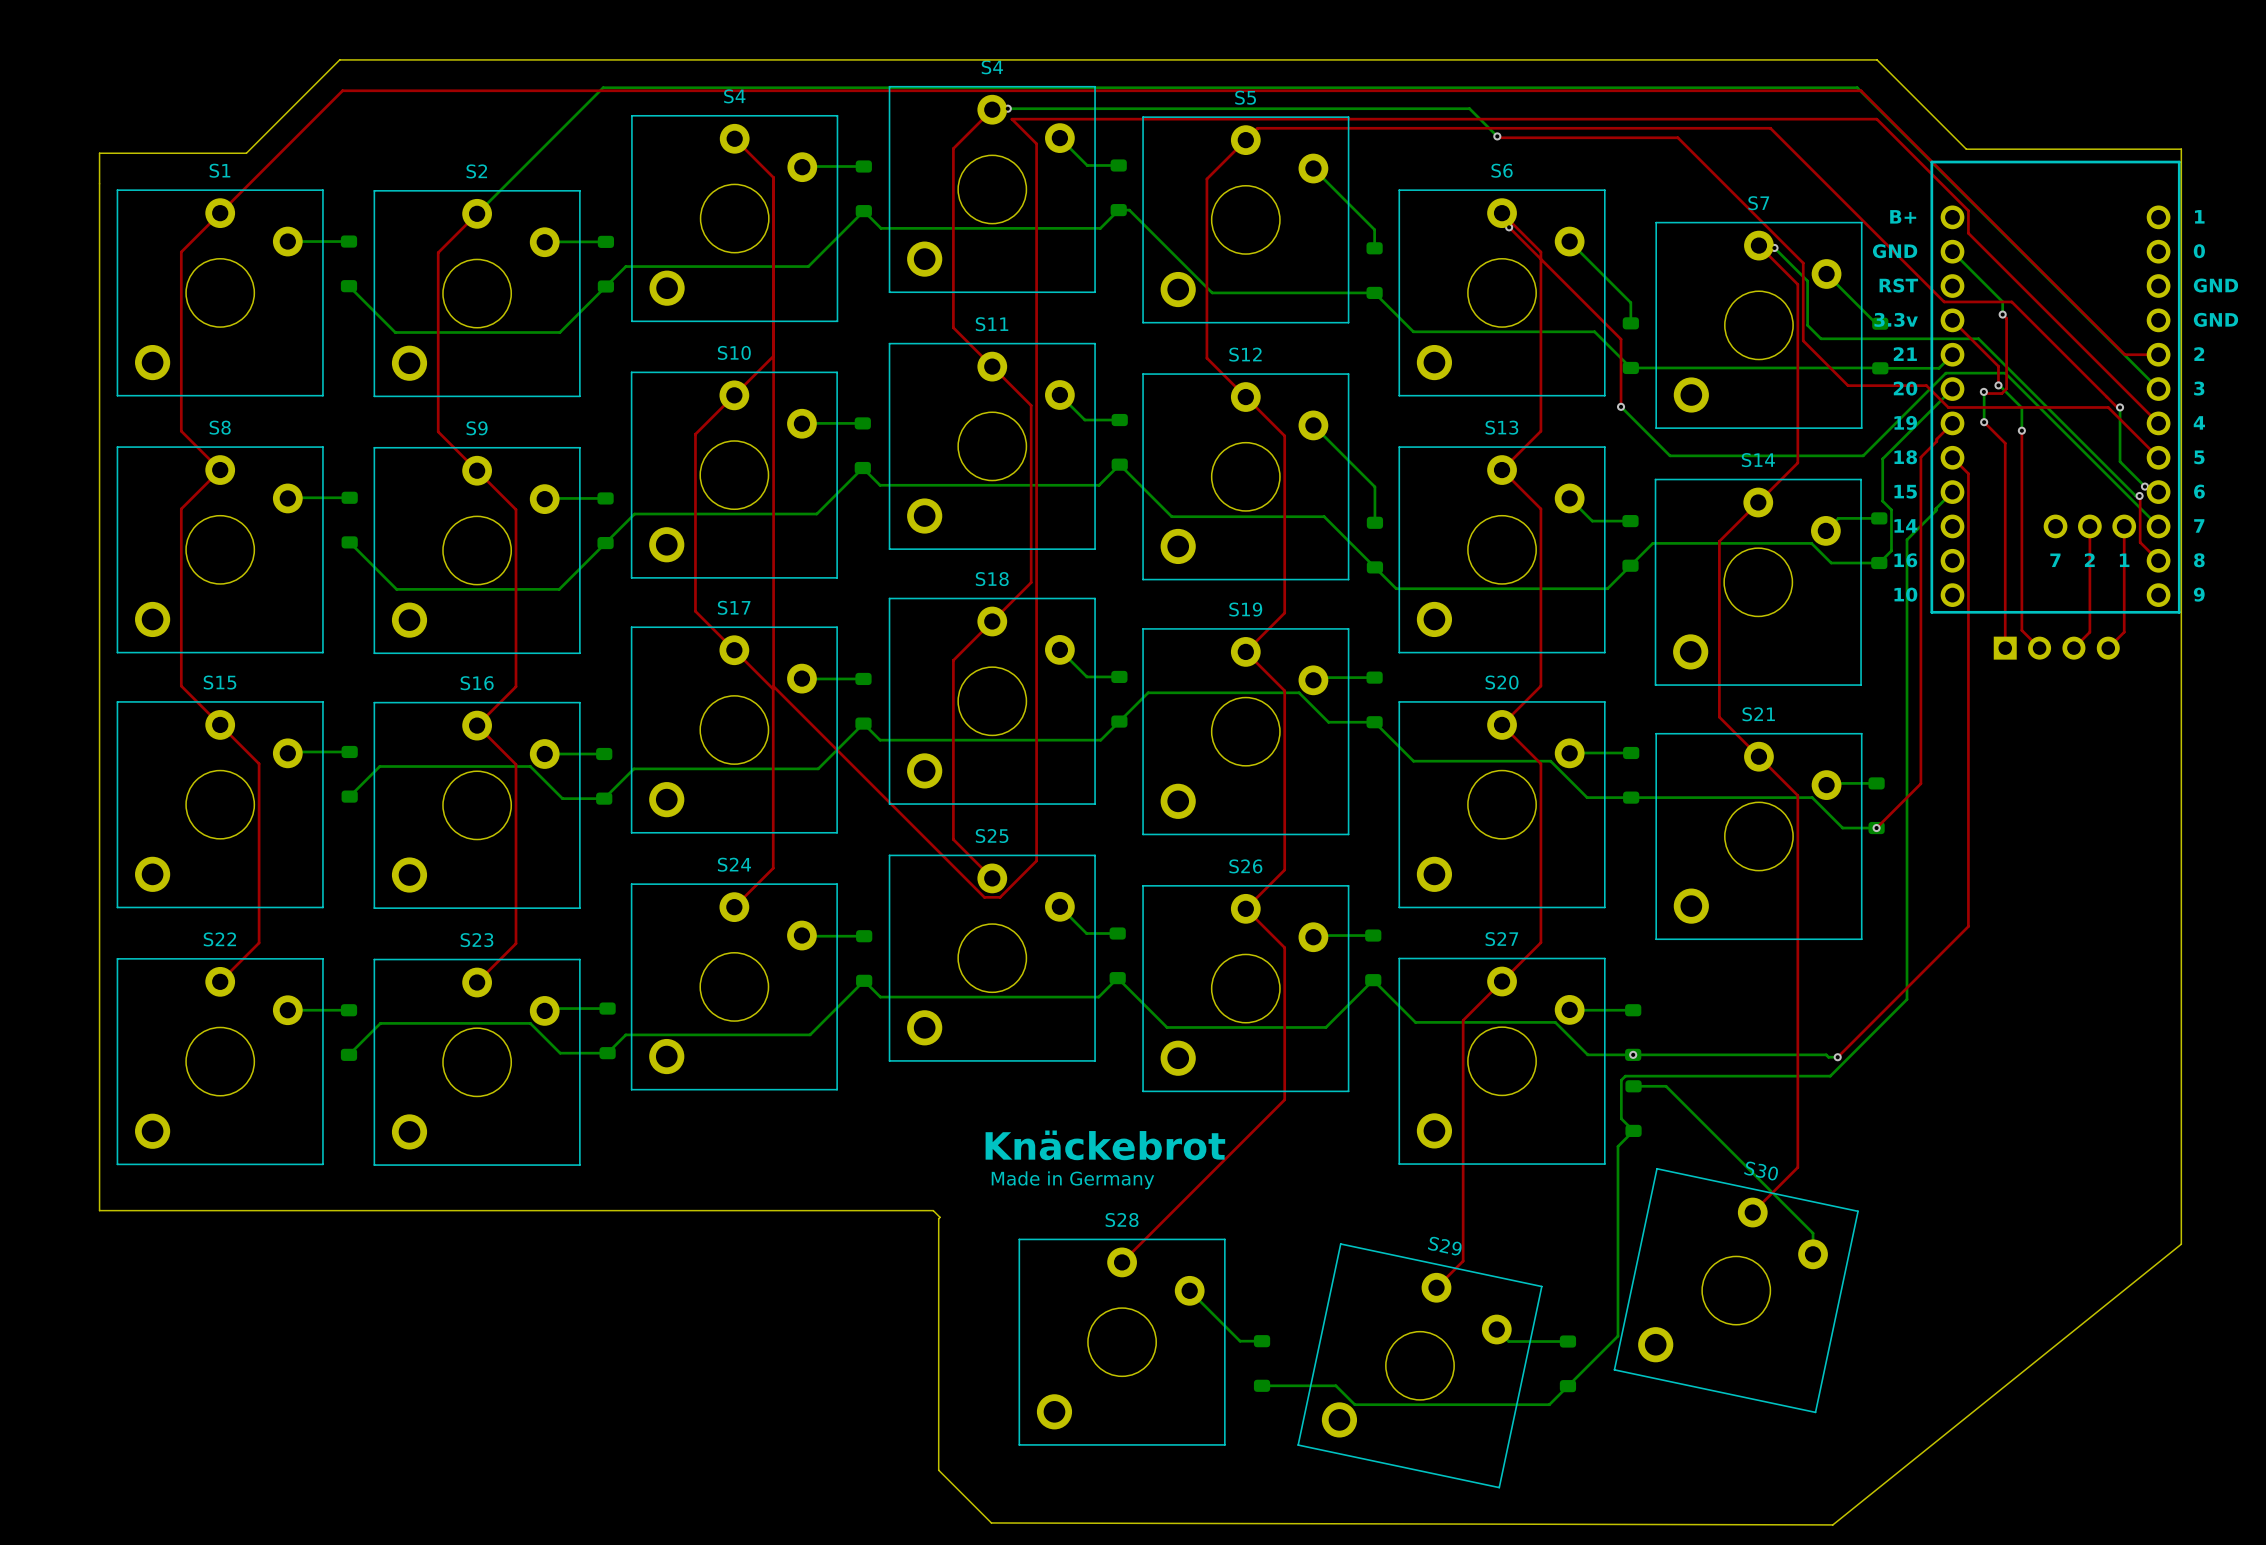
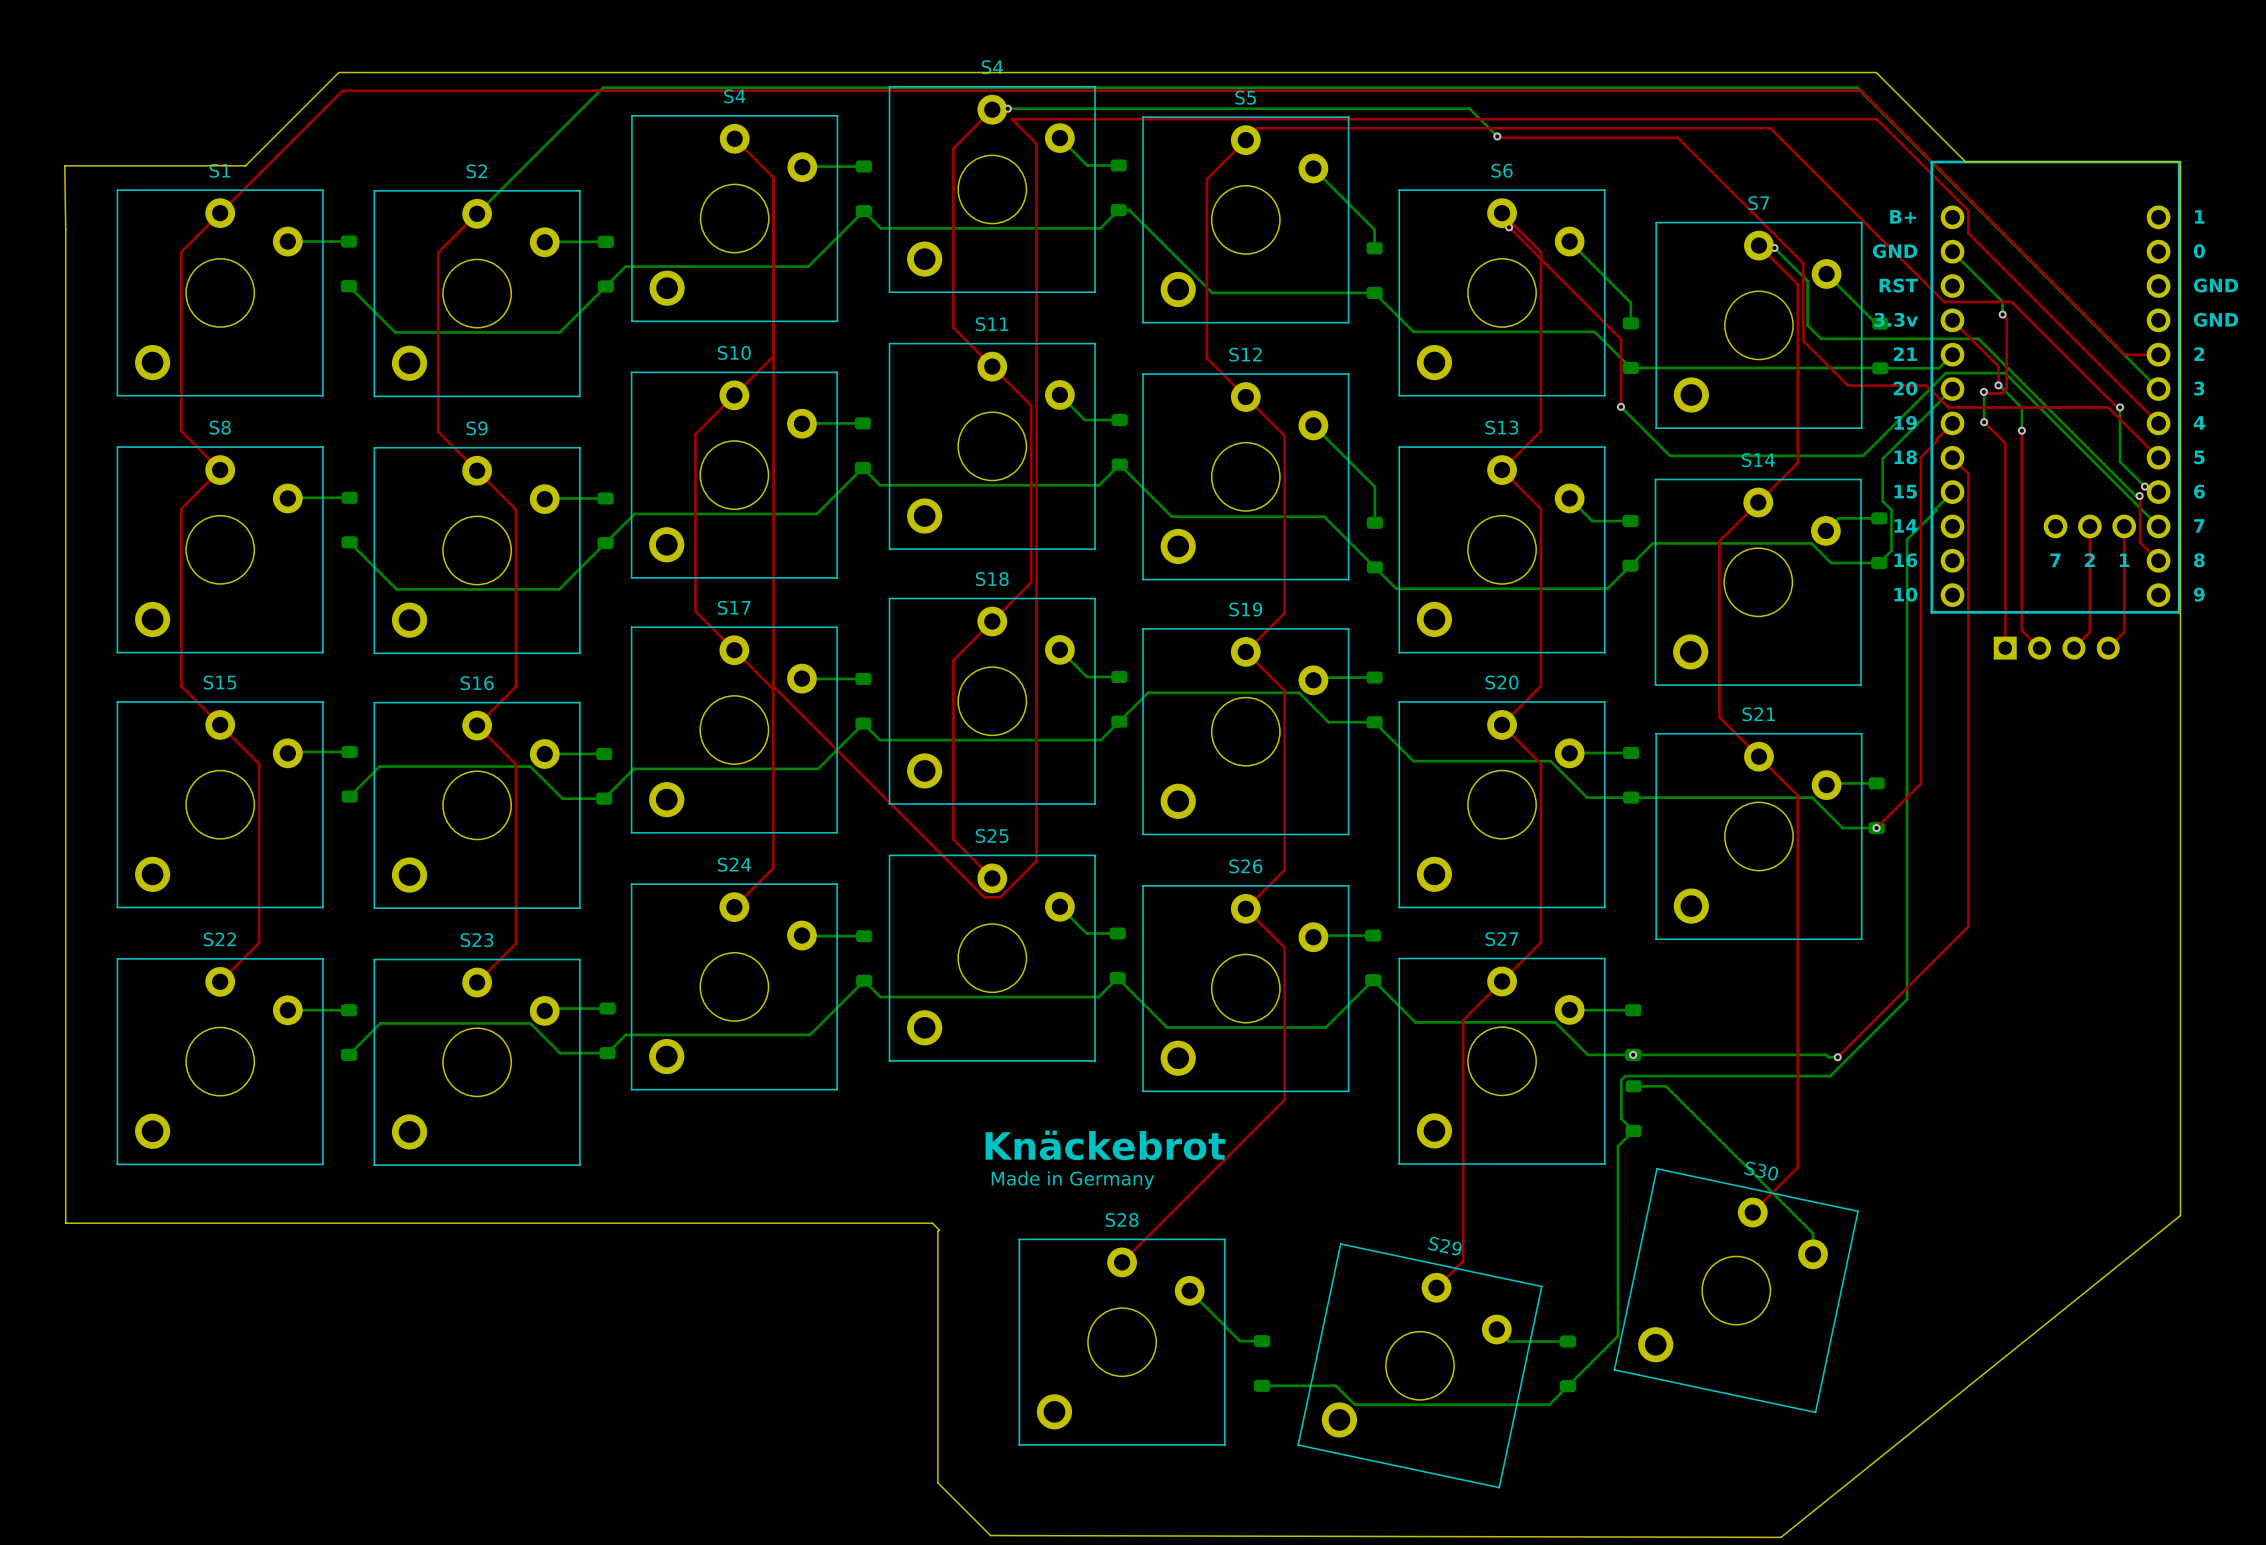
board edge: (339, 59) (246, 153) (99, 153) (99, 1210) (933, 1210) (940, 1217) (938, 1470) (991, 1522) (1832, 1524) (2181, 1244) (2181, 149) (1966, 149) (1877, 59) (339, 59) -> (338, 72) (245, 165) (64, 165) (65, 1223) (932, 1223) (939, 1229) (937, 1482) (990, 1535) (1780, 1537) (2180, 1215) (2180, 161) (1965, 161) (1876, 72) (338, 72)

